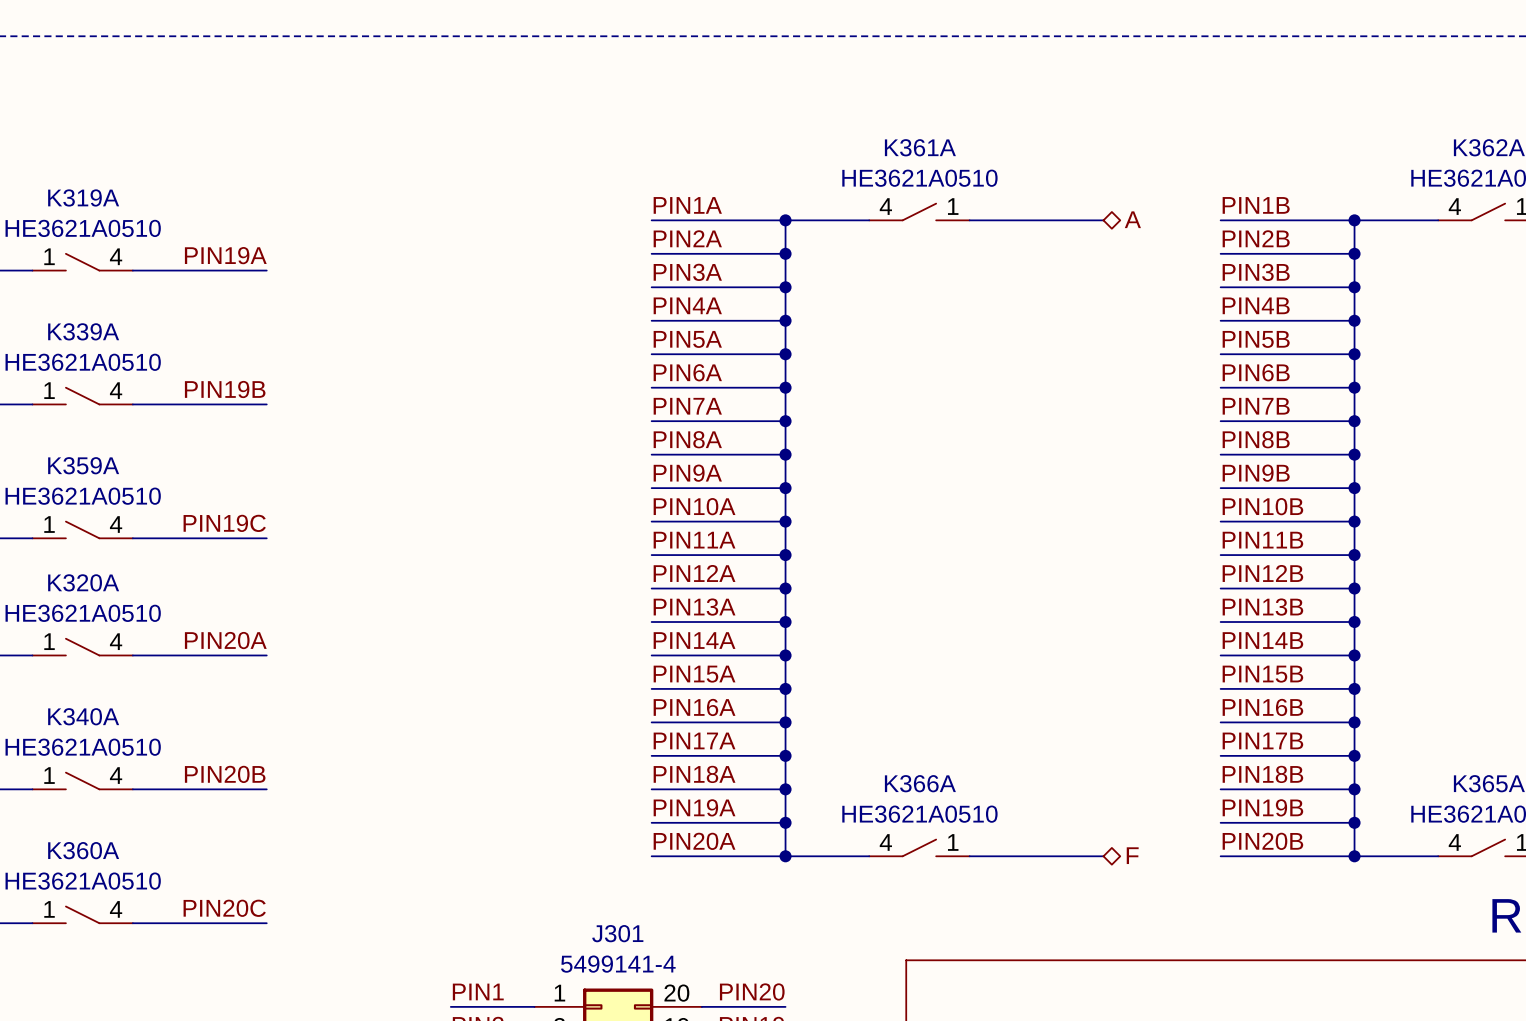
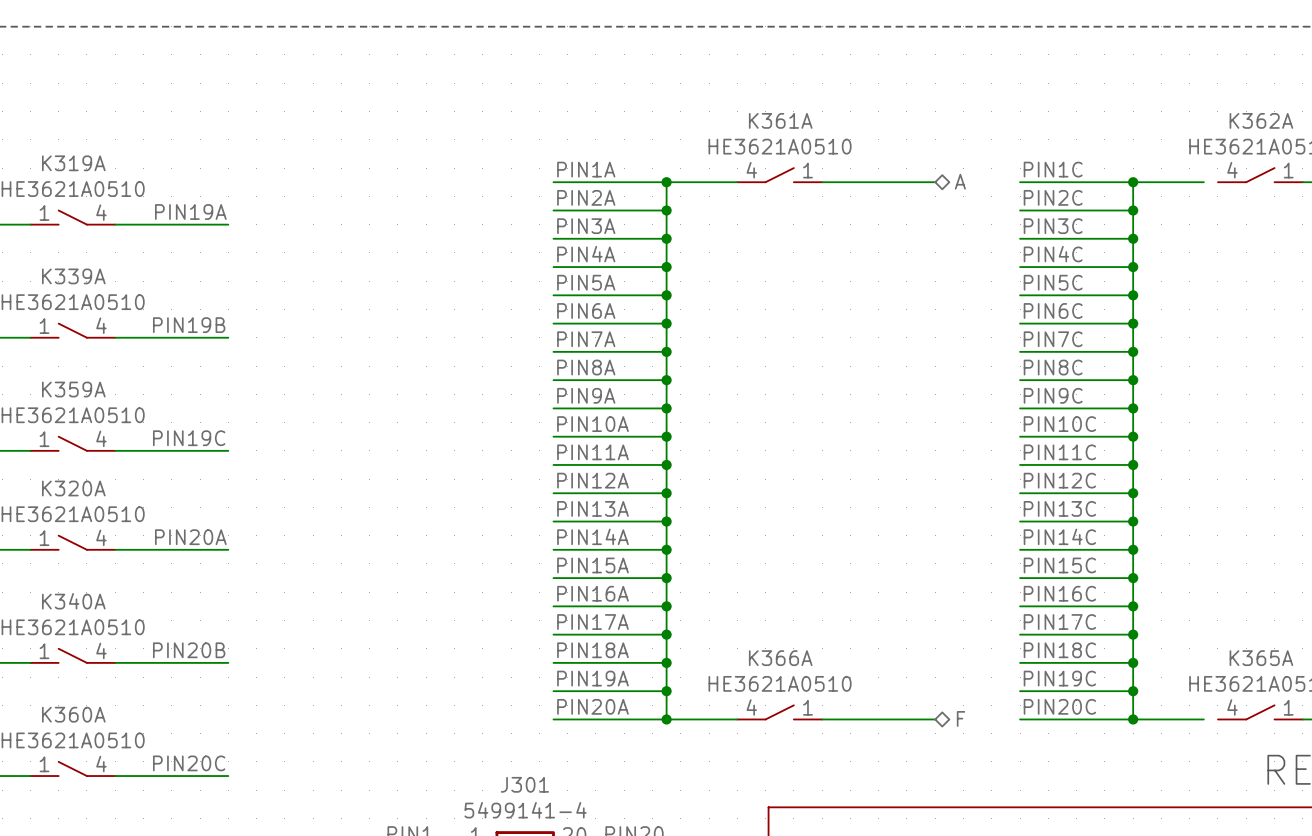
label: PIN1B (1256, 205) -> PIN1C (1053, 169)
wire: (1354, 220) (1354, 856) -> (1133, 182) (1133, 719)
junction position: (1354, 220) -> (1133, 182)
wire: (1421, 220) (1438, 220) -> (1020, 182) (1034, 182)
label: PIN2B (1256, 238) -> PIN2C (1053, 197)
wire: (1337, 253) (1354, 253) -> (1020, 210) (1034, 210)
junction position: (1354, 253) -> (1133, 210)
label: PIN3B (1256, 272) -> PIN3C (1053, 226)
wire: (1337, 287) (1354, 287) -> (1020, 238) (1034, 238)
junction position: (1354, 287) -> (1133, 238)
label: PIN4B (1256, 305) -> PIN4C (1053, 254)
wire: (1337, 320) (1354, 320) -> (1020, 267) (1034, 267)
junction position: (1354, 320) -> (1133, 267)
label: PIN5B (1256, 339) -> PIN5C (1053, 282)
wire: (1337, 354) (1354, 354) -> (1020, 295) (1034, 295)
junction position: (1354, 354) -> (1133, 295)
label: PIN6B (1256, 372) -> PIN6C (1053, 310)
wire: (1337, 387) (1354, 387) -> (1020, 323) (1034, 323)
junction position: (1354, 387) -> (1133, 323)
label: PIN7B (1256, 406) -> PIN7C (1053, 339)
wire: (1337, 421) (1354, 421) -> (1020, 351) (1034, 351)
junction position: (1354, 421) -> (1133, 351)
label: PIN8B (1256, 439) -> PIN8C (1053, 367)
wire: (1337, 454) (1354, 454) -> (1020, 380) (1034, 380)
junction position: (1354, 454) -> (1133, 380)
label: PIN9B (1256, 473) -> PIN9C (1053, 395)
wire: (1337, 488) (1354, 488) -> (1020, 408) (1034, 408)
junction position: (1354, 488) -> (1133, 408)
label: PIN10B (1262, 506) -> PIN10C (1059, 424)
wire: (1337, 521) (1354, 521) -> (1020, 436) (1034, 436)
junction position: (1354, 521) -> (1133, 436)
label: PIN11B (1262, 540) -> PIN11C (1059, 452)
wire: (1337, 555) (1354, 555) -> (1020, 464) (1034, 464)
junction position: (1354, 555) -> (1133, 464)
label: PIN12B (1262, 573) -> PIN12C (1059, 480)
wire: (1337, 588) (1354, 588) -> (1020, 493) (1034, 493)
junction position: (1354, 588) -> (1133, 493)
label: PIN13B (1262, 607) -> PIN13C (1059, 508)
wire: (1337, 622) (1354, 622) -> (1020, 521) (1034, 521)
junction position: (1354, 622) -> (1133, 521)
label: PIN14B (1262, 640) -> PIN14C (1059, 536)
wire: (1337, 655) (1354, 655) -> (1020, 549) (1034, 549)
junction position: (1354, 655) -> (1133, 549)
label: PIN15B (1262, 674) -> PIN15C (1059, 565)
wire: (1337, 688) (1354, 688) -> (1020, 578) (1034, 578)
junction position: (1354, 688) -> (1133, 578)
label: PIN16B (1262, 707) -> PIN16C (1059, 593)
wire: (1337, 722) (1354, 722) -> (1020, 606) (1034, 606)
junction position: (1354, 722) -> (1133, 606)
label: PIN17B (1262, 740) -> PIN17C (1059, 622)
wire: (1337, 755) (1354, 755) -> (1020, 634) (1034, 634)
junction position: (1354, 755) -> (1133, 634)
label: PIN18B (1262, 774) -> PIN18C (1059, 650)
wire: (1337, 789) (1354, 789) -> (1020, 662) (1034, 662)
junction position: (1354, 789) -> (1133, 662)
label: PIN19B (1262, 807) -> PIN19C (1059, 678)
wire: (1337, 822) (1354, 822) -> (1020, 691) (1034, 691)
junction position: (1354, 822) -> (1133, 691)
label: PIN20B (1262, 841) -> PIN20C (1059, 706)
junction position: (1354, 856) -> (1133, 719)
wire: (1421, 856) (1438, 856) -> (1020, 719) (1034, 719)

